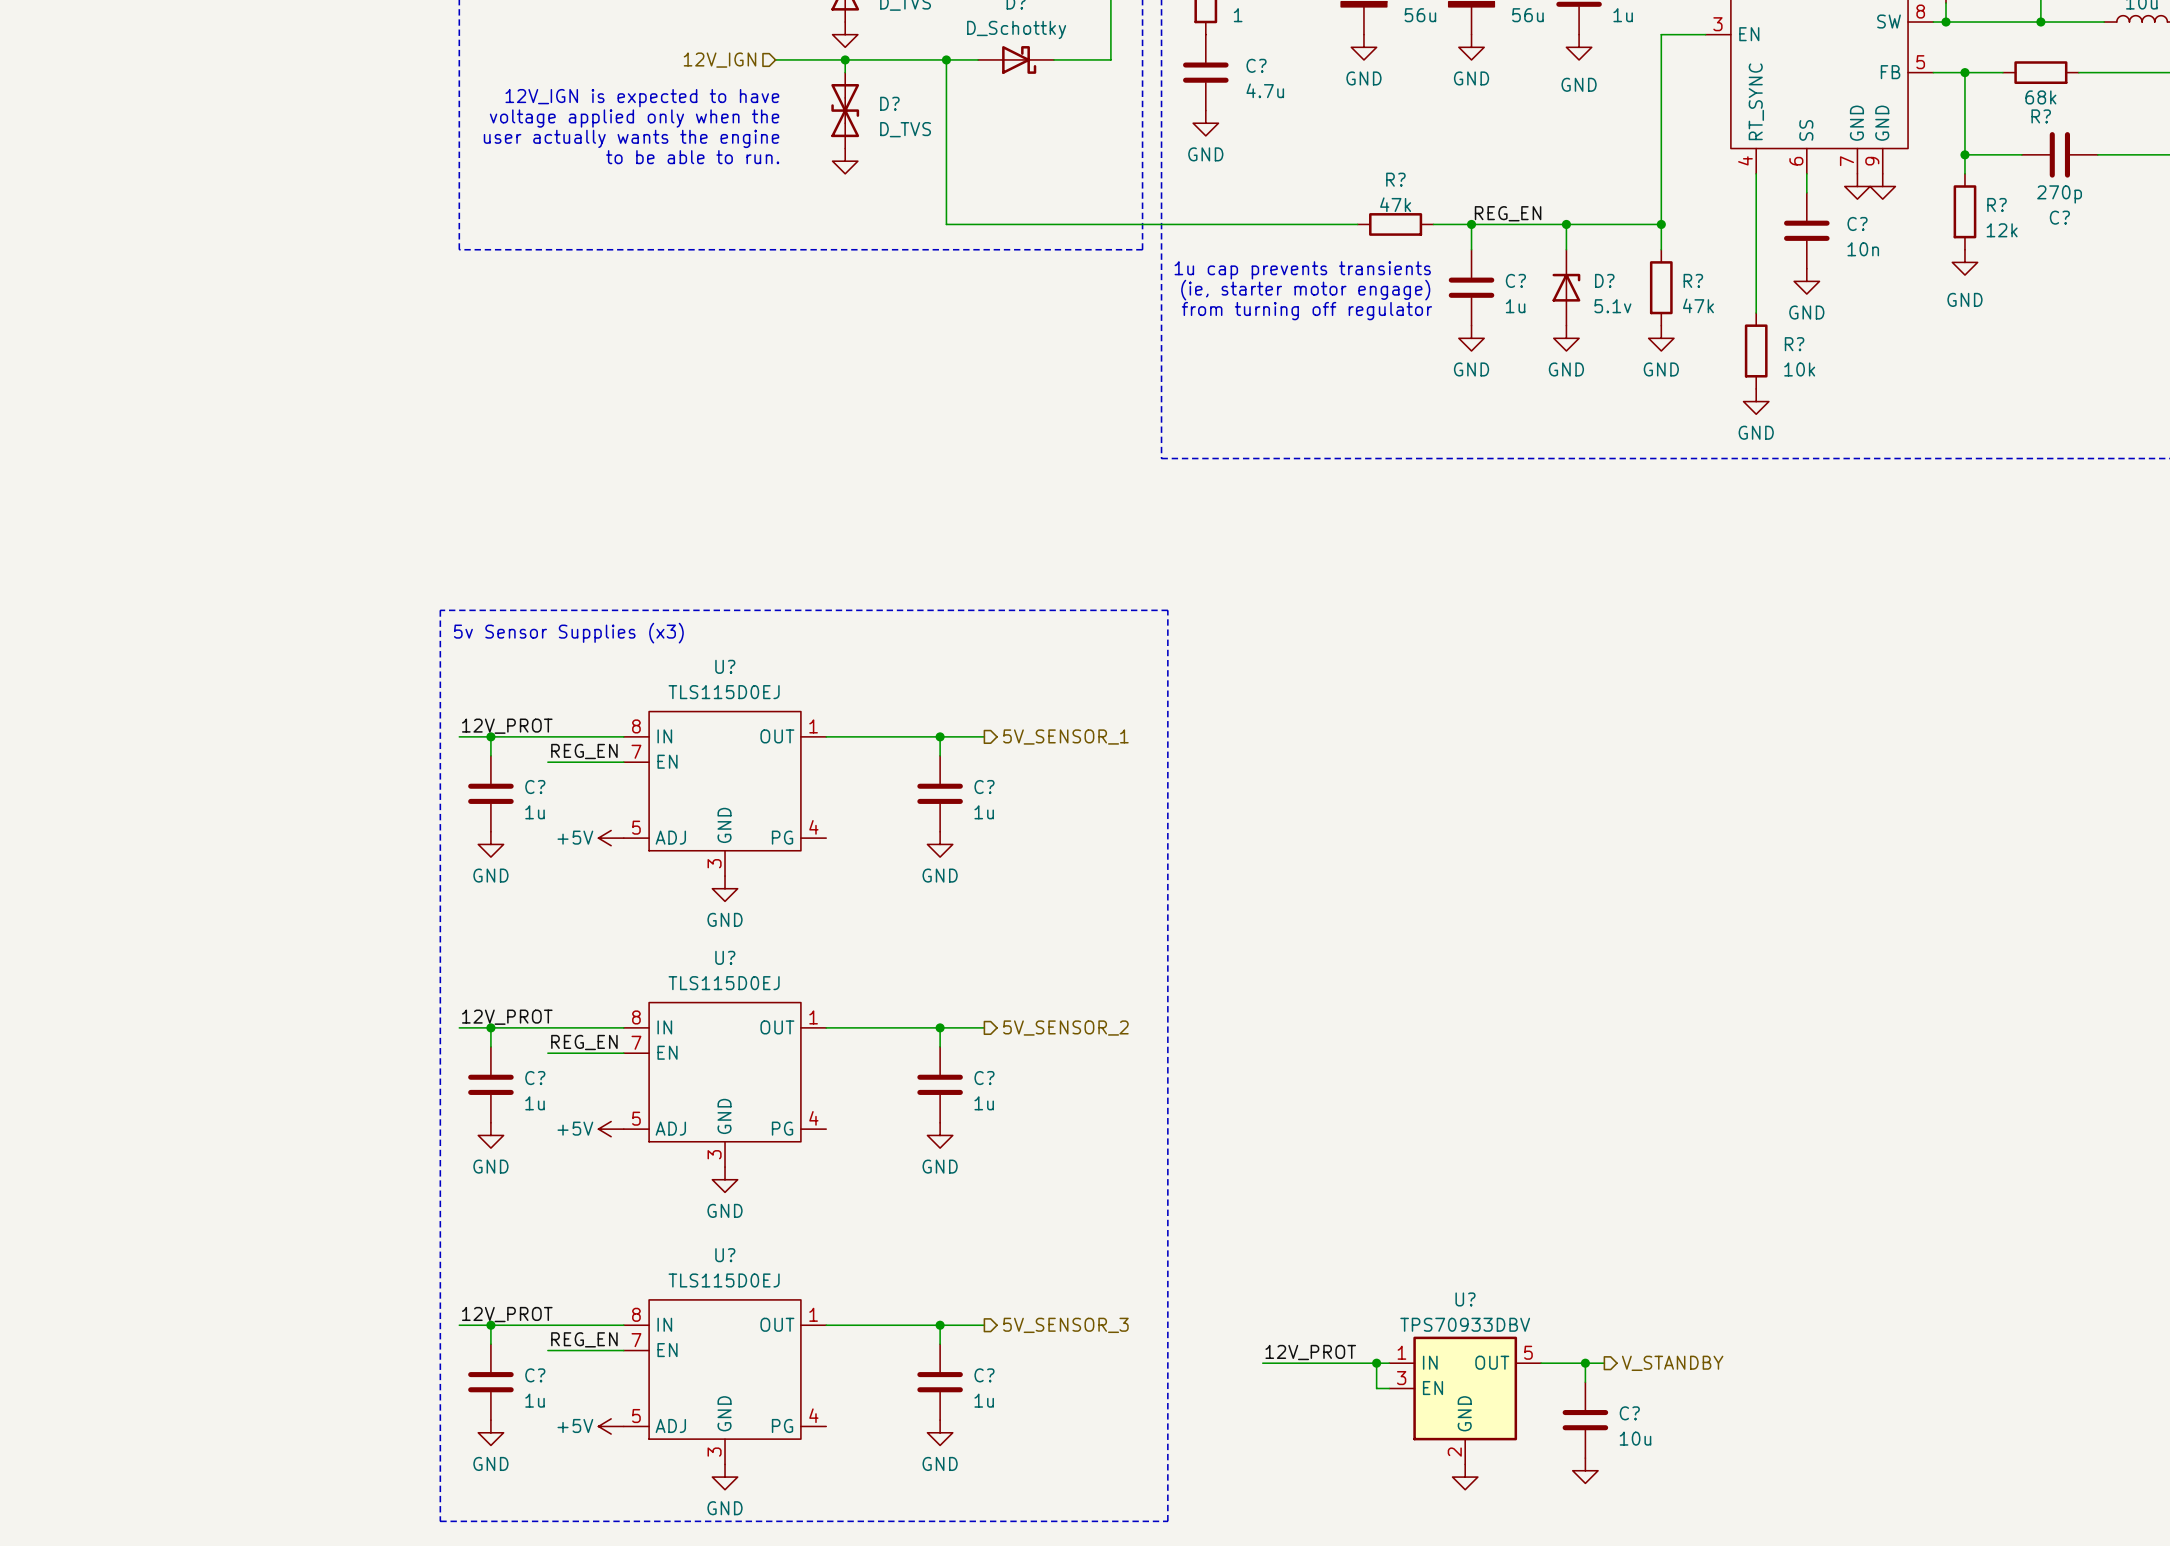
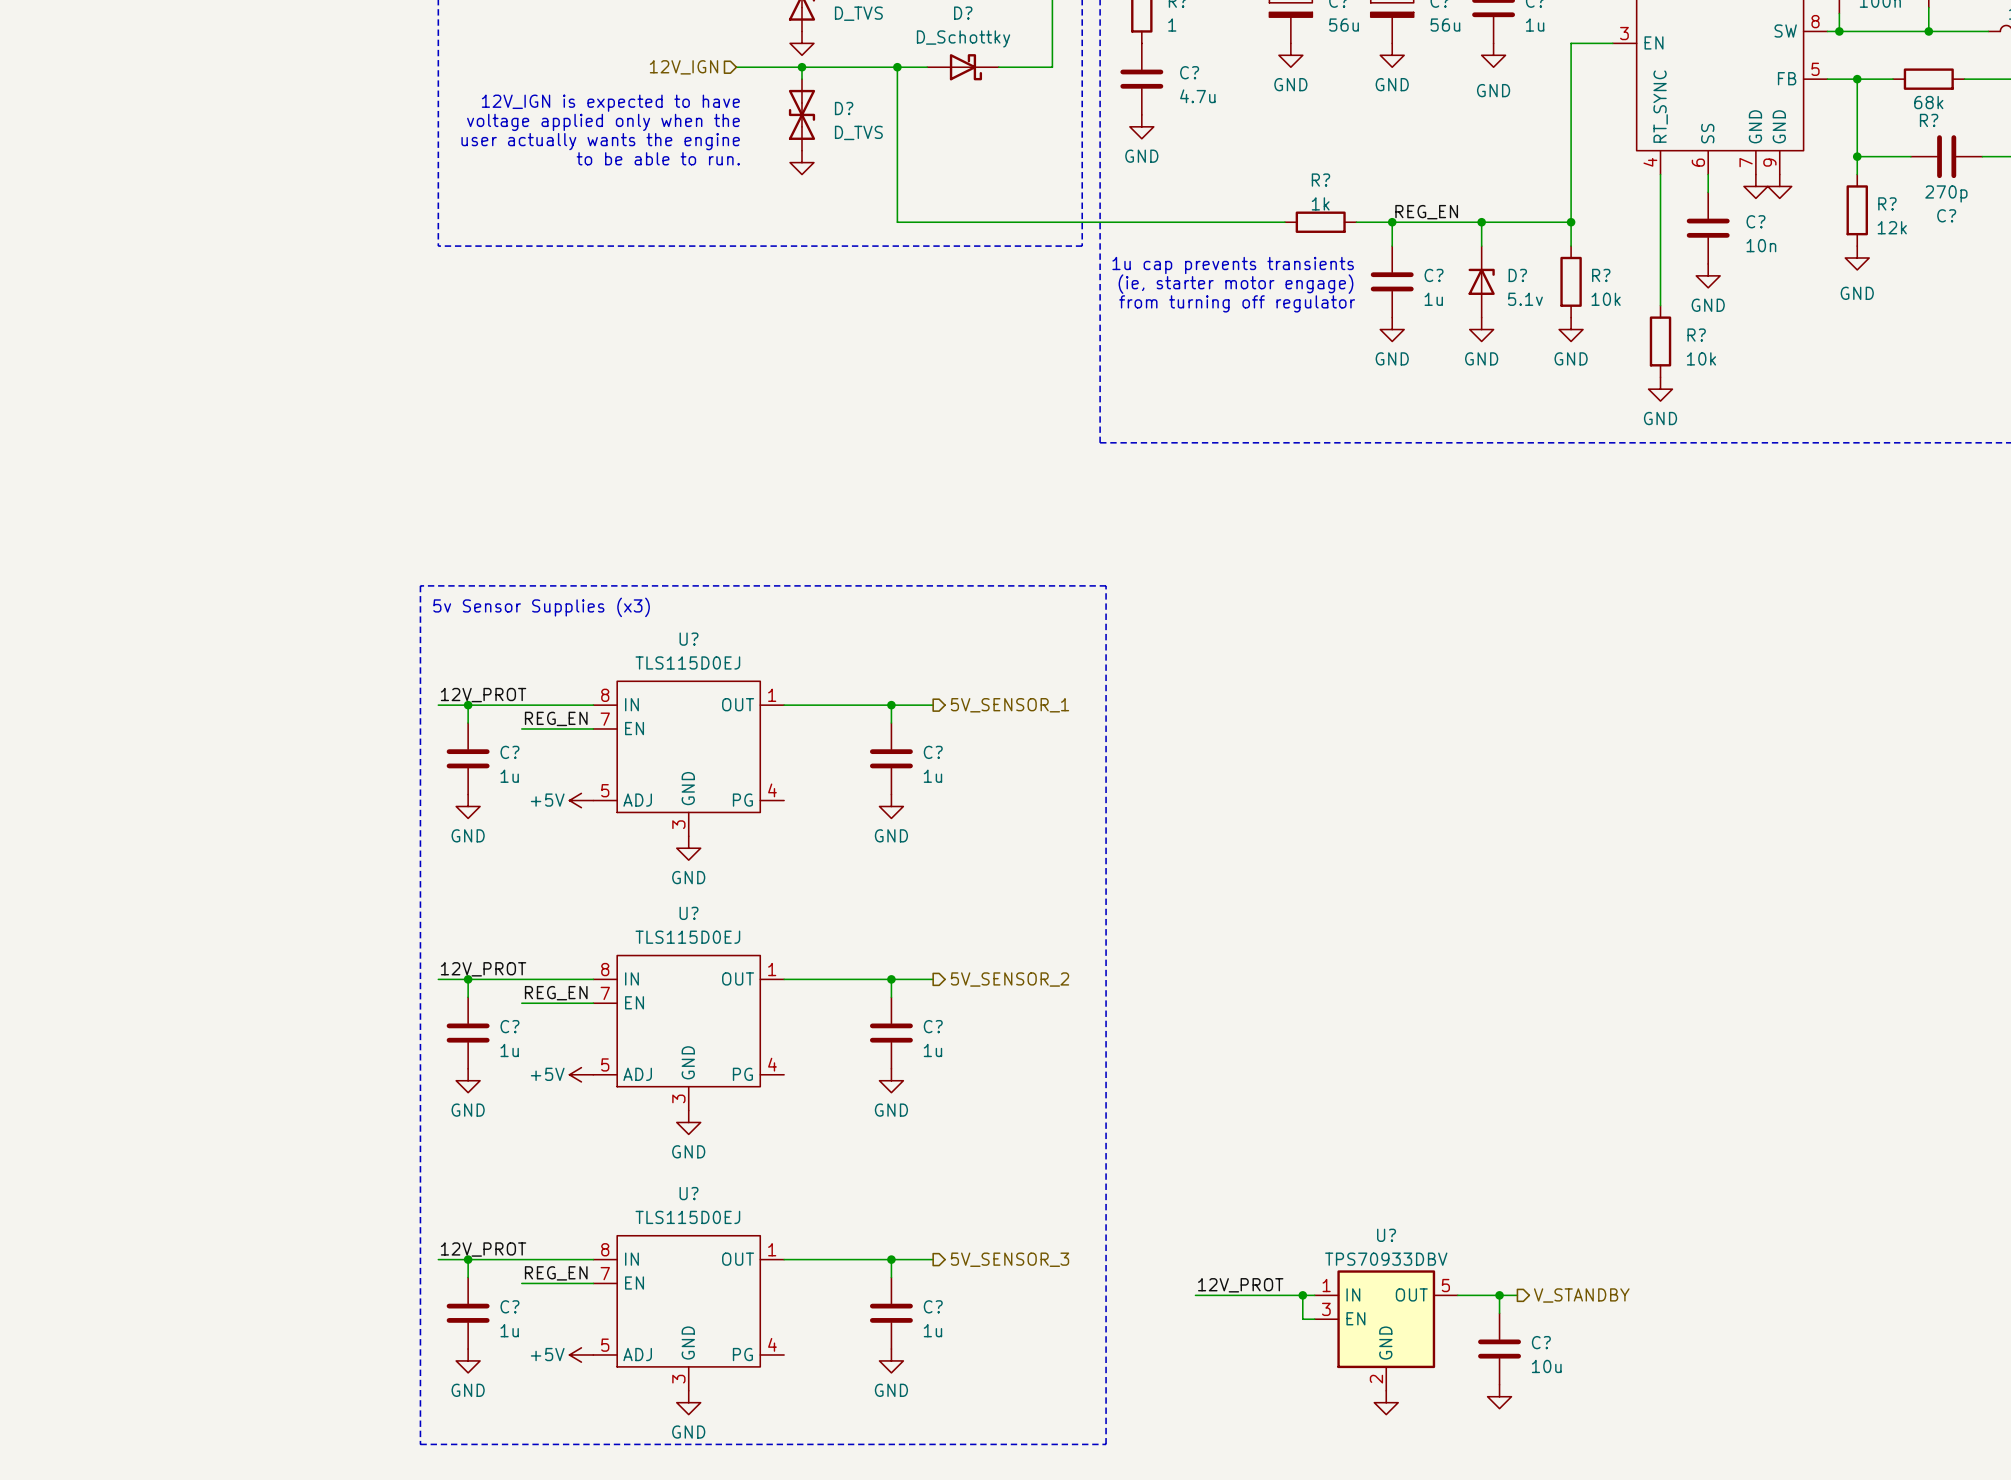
R? value: 47k (1395, 204) -> 1k (1320, 203)
R? value: 47k (1698, 305) -> 10k (1606, 299)

